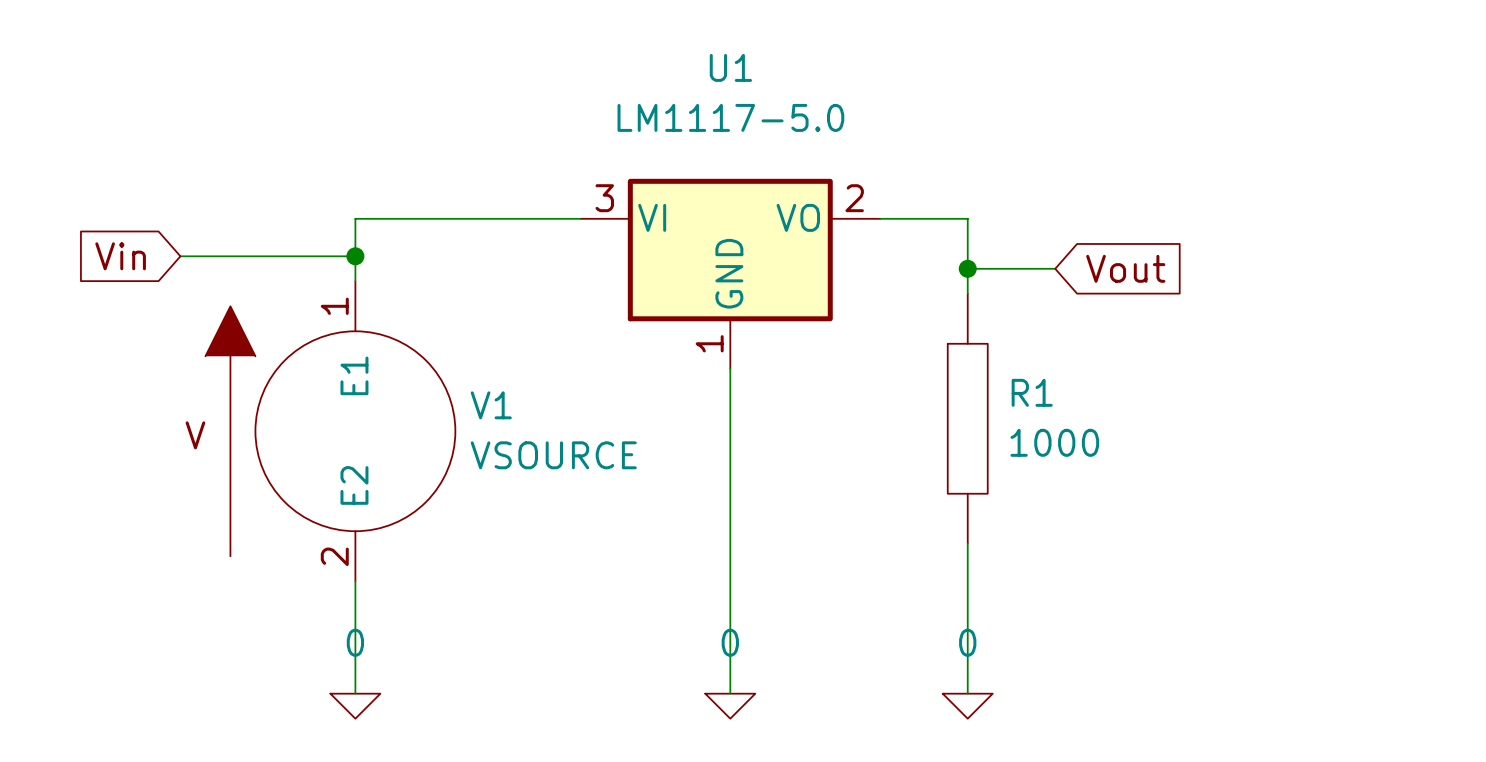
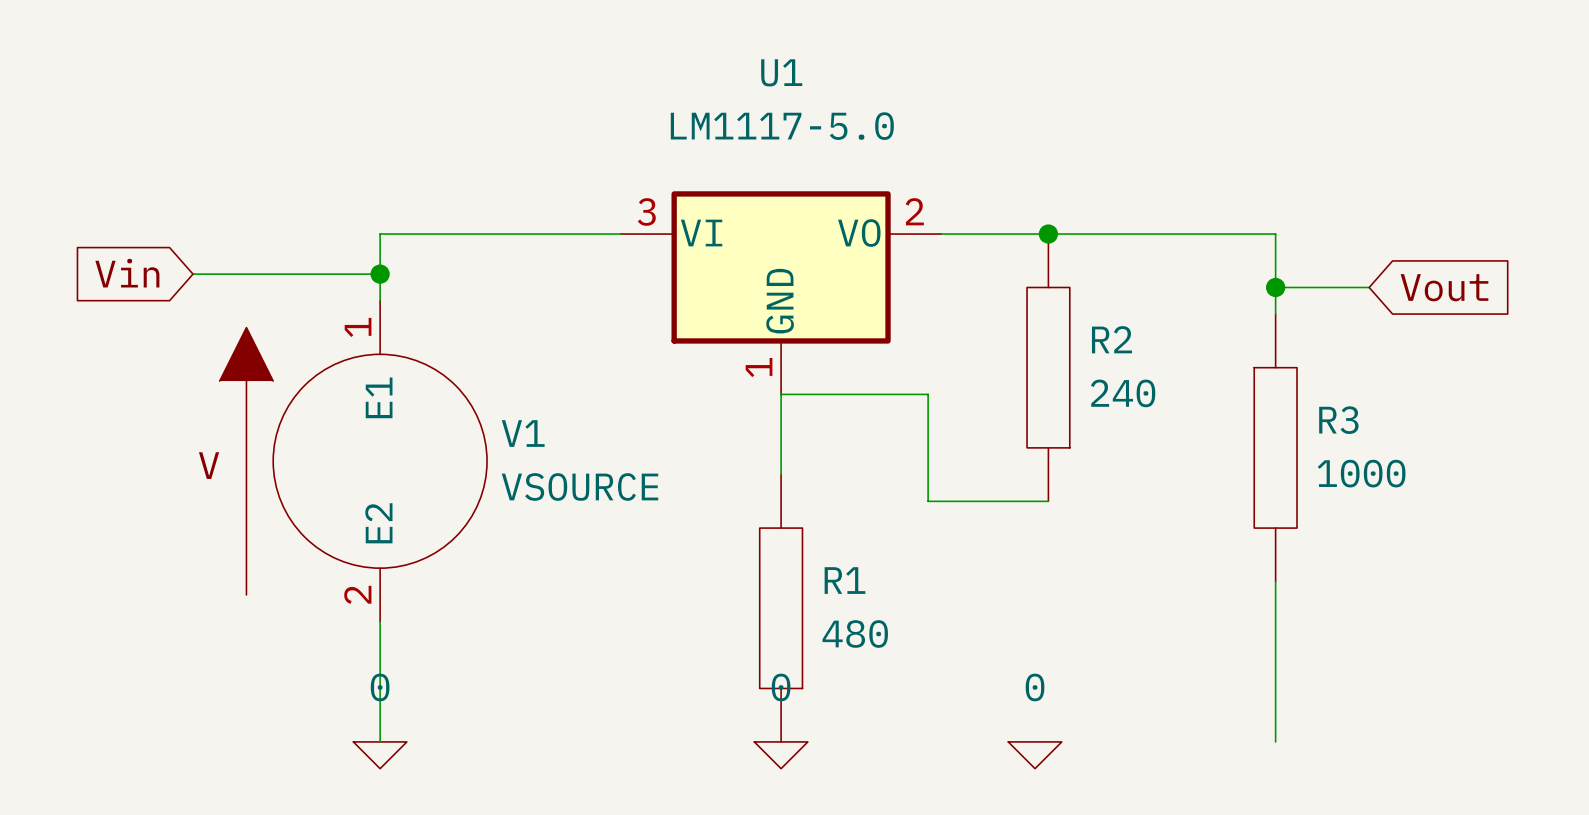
wire: (967, 218) (967, 293) -> (1035, 234) (1275, 234) (1275, 314)
wire: (967, 268) (1055, 268) -> (1275, 287) (1369, 287)
junction position: (967, 268) -> (1048, 234)
global label position: Vout (1125, 268) -> Vout (1444, 287)
junction: none -> (1275, 287)
R2: none -> 240 (1048, 367)
wire: none -> (781, 394) (928, 394) (928, 501) (1048, 501)
R1 position: (967, 418) -> (781, 608)
R3: none -> 1000 (1275, 447)
R1 value: 1000 (1054, 442) -> 480 (855, 634)
wire: (730, 443) (730, 693) -> none
wire: (967, 543) (967, 693) -> (1275, 581) (1275, 741)

